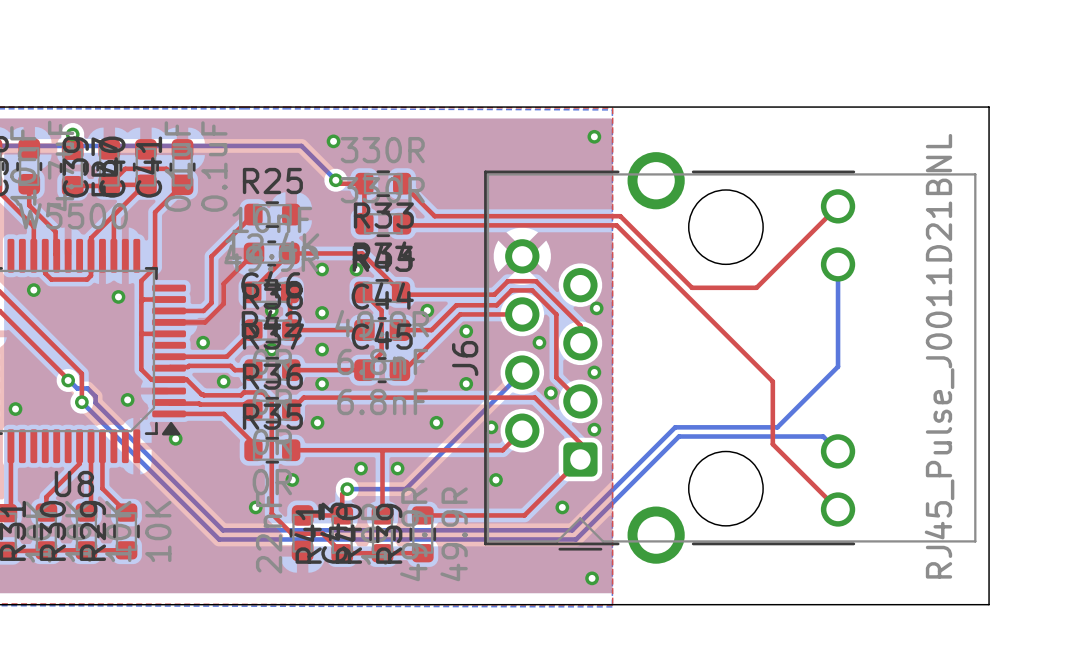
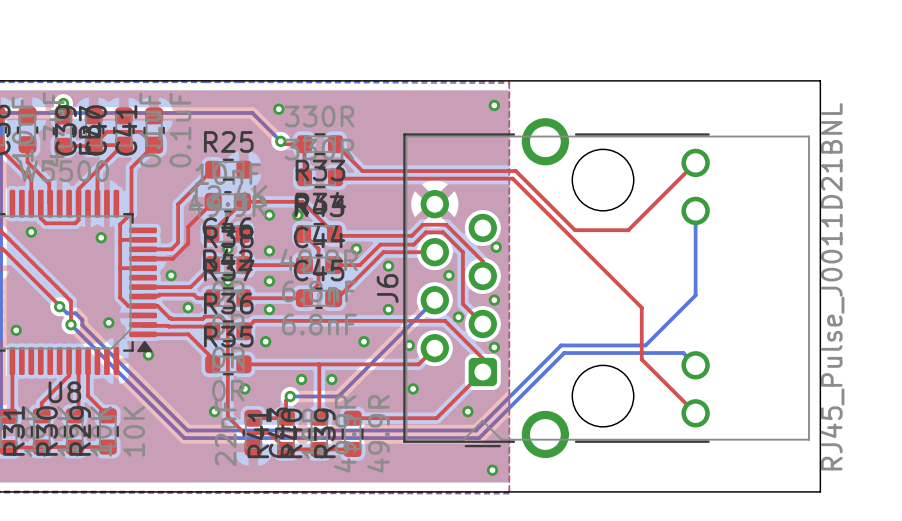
J6 value position: RJ45_Pulse_J0011D21BNL (939, 356) -> RJ45_Pulse_J0011D21BNL (832, 286)

